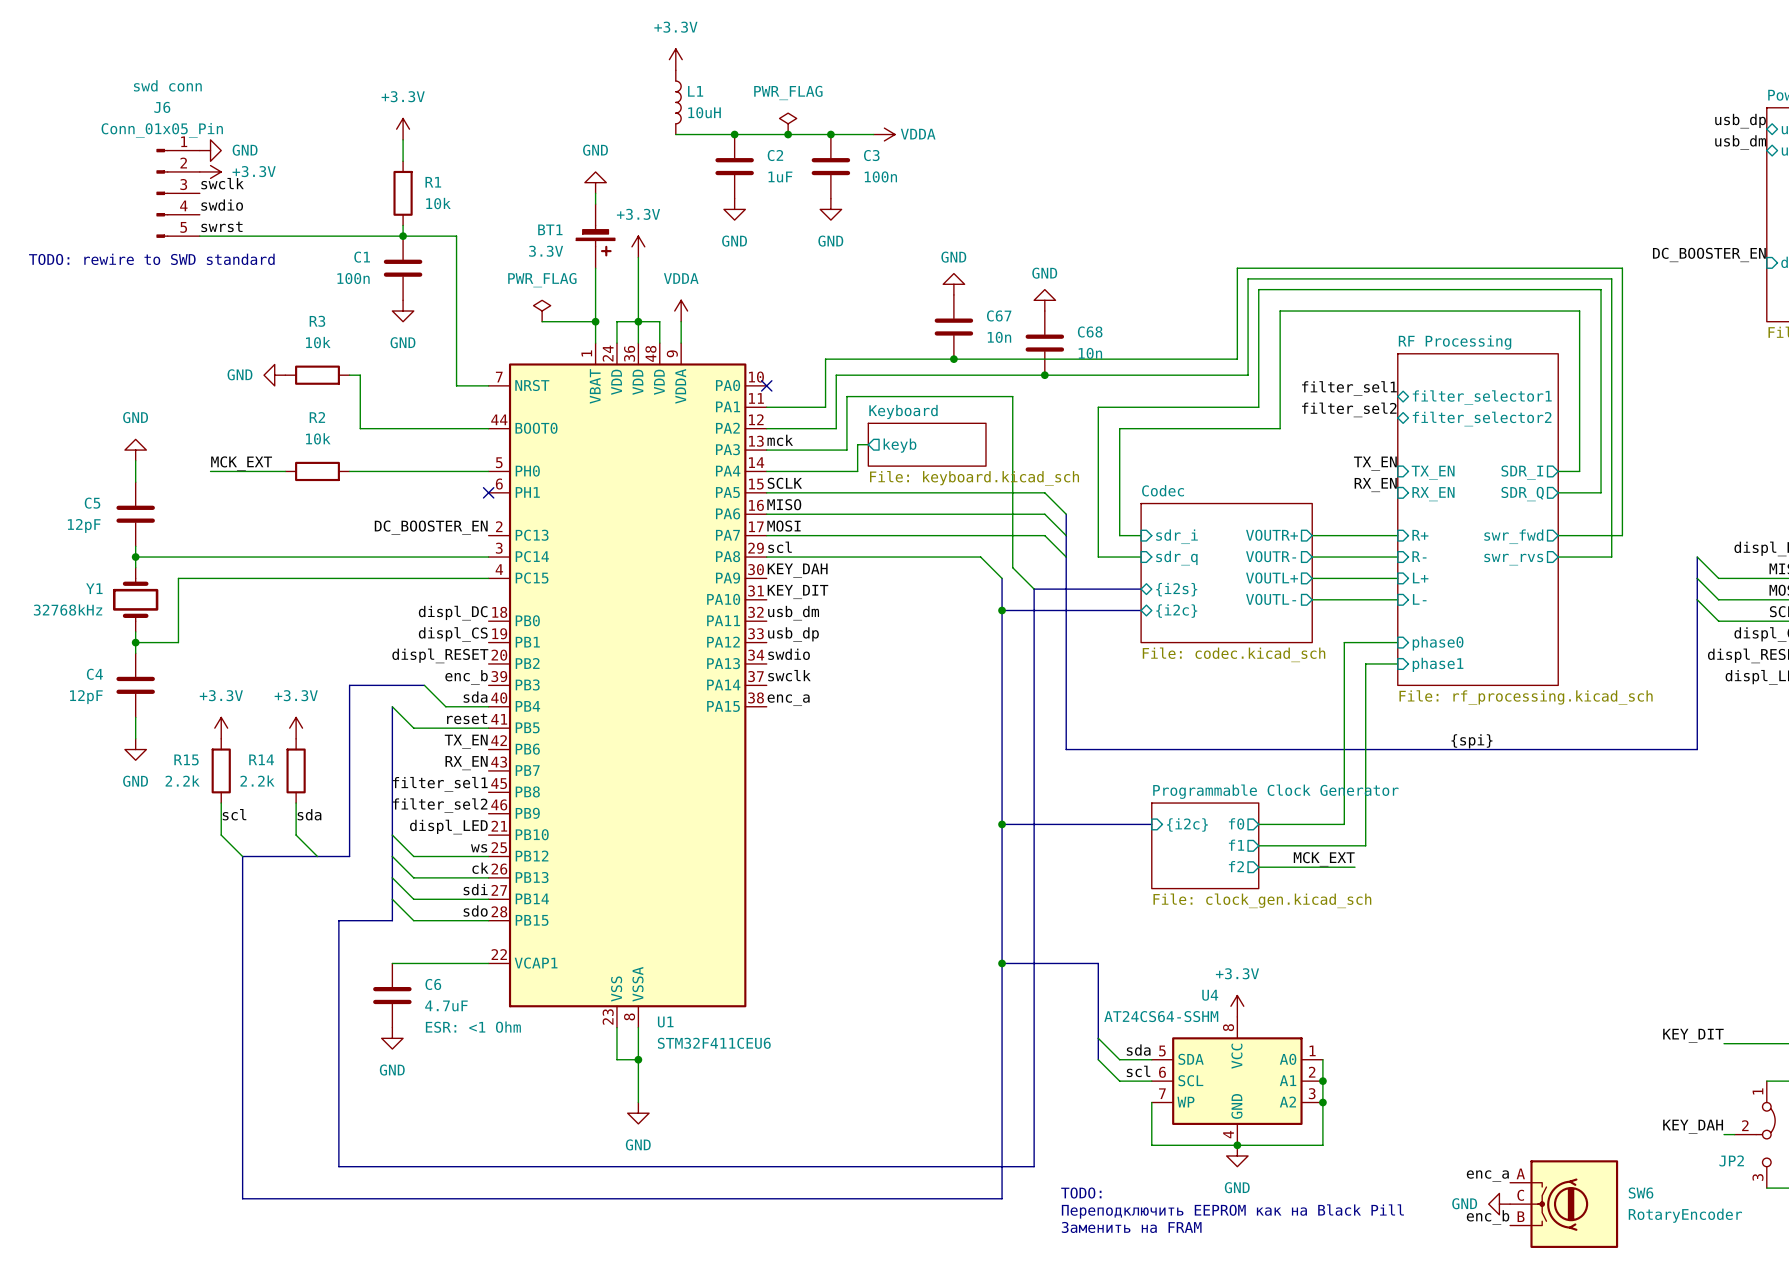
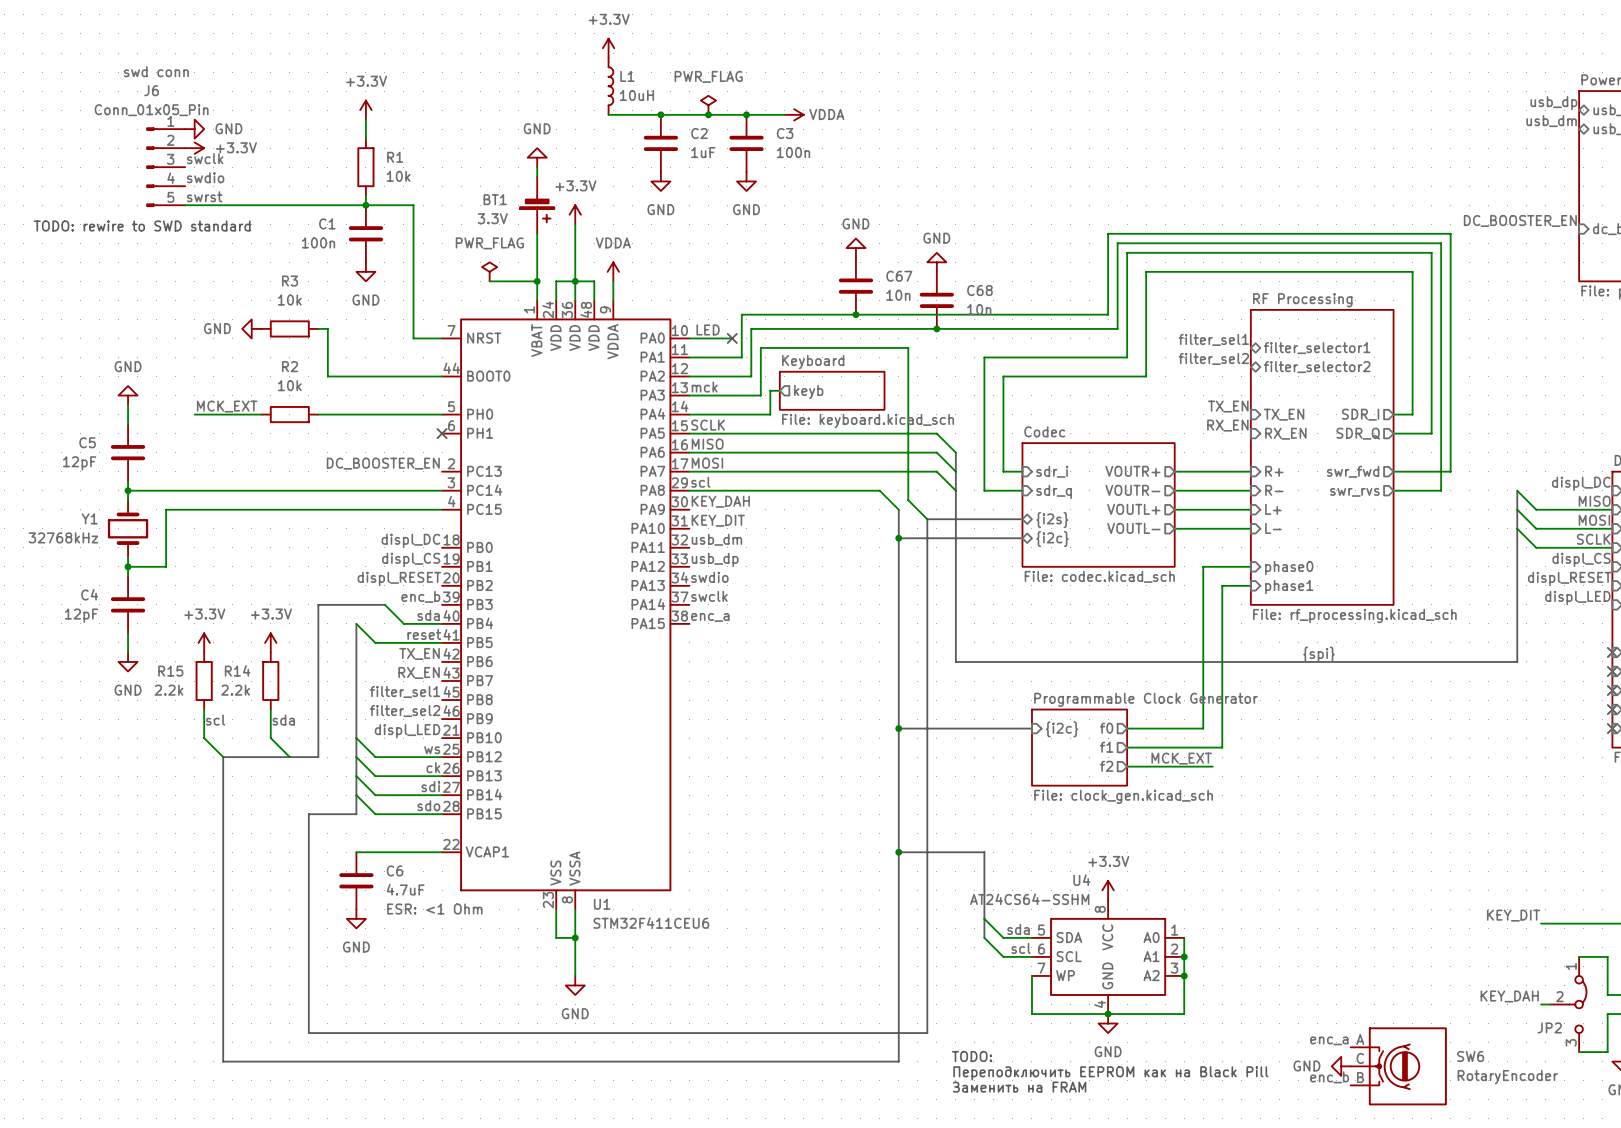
label: none -> LED (708, 329)
wire: none -> (689, 338) (732, 338)
no-connect mark position: (766, 385) -> (732, 338)

